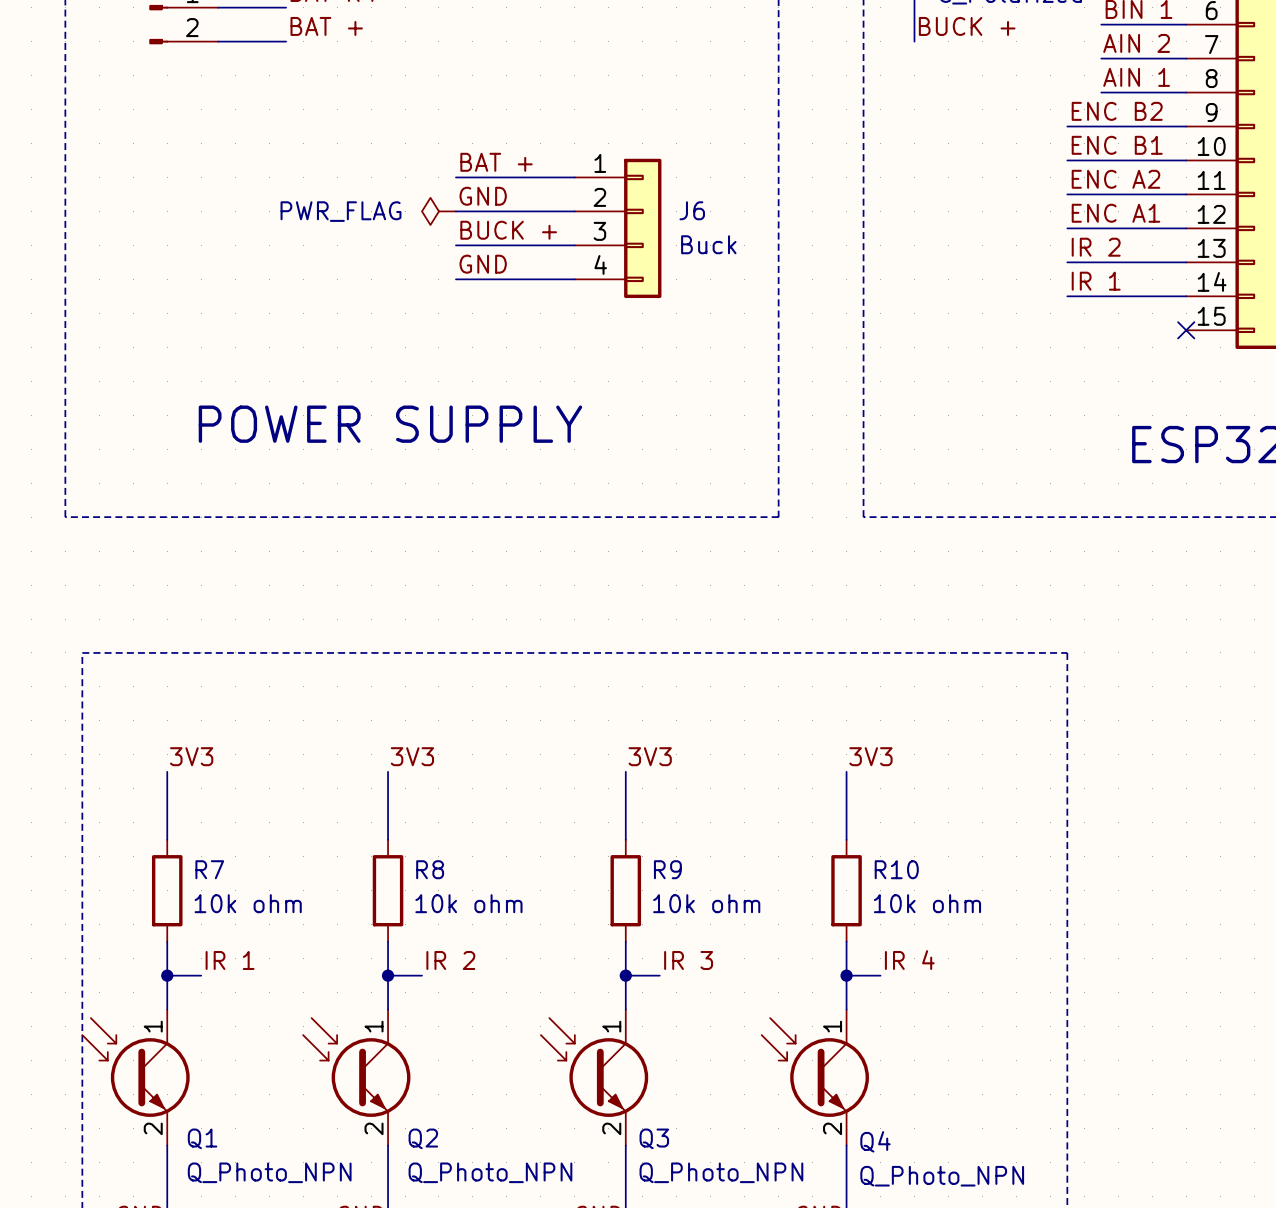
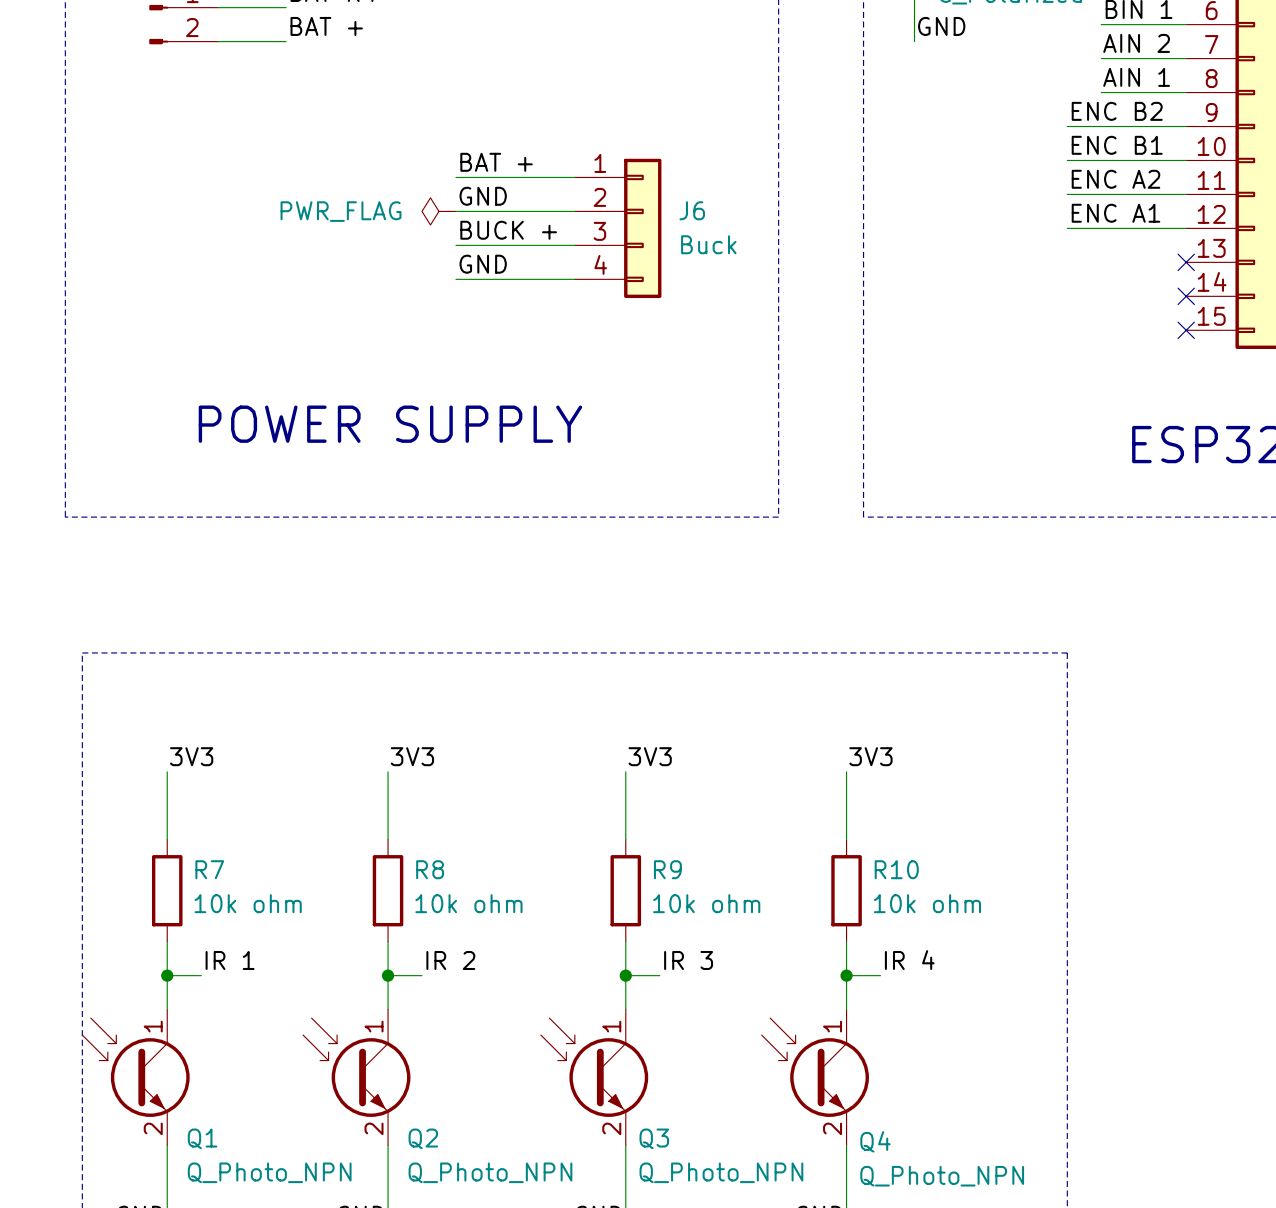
label: BUCK + (967, 26) -> GND (941, 26)
label: IR 2 (1096, 247) -> none
wire: (1067, 262) (1186, 262) -> none
no-connect mark: none -> (1186, 262)
label: IR 1 (1096, 281) -> none
wire: (1067, 296) (1186, 296) -> none
no-connect mark: none -> (1186, 296)

